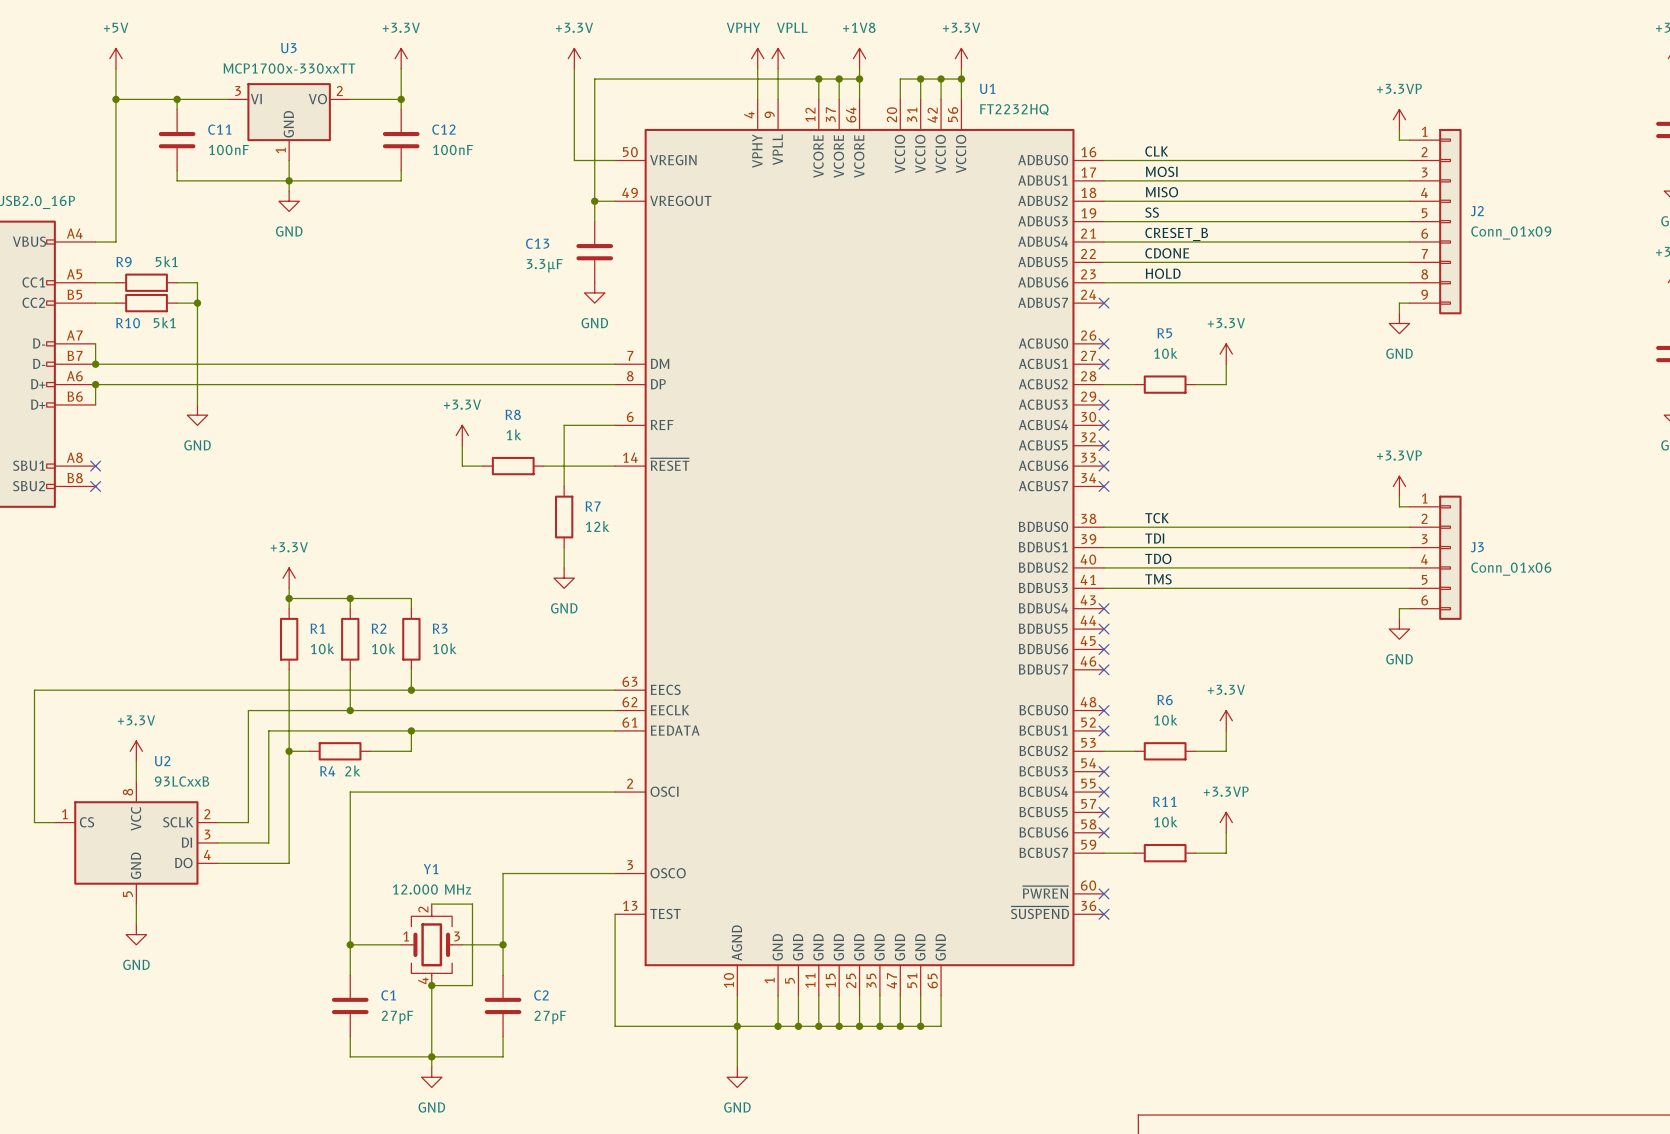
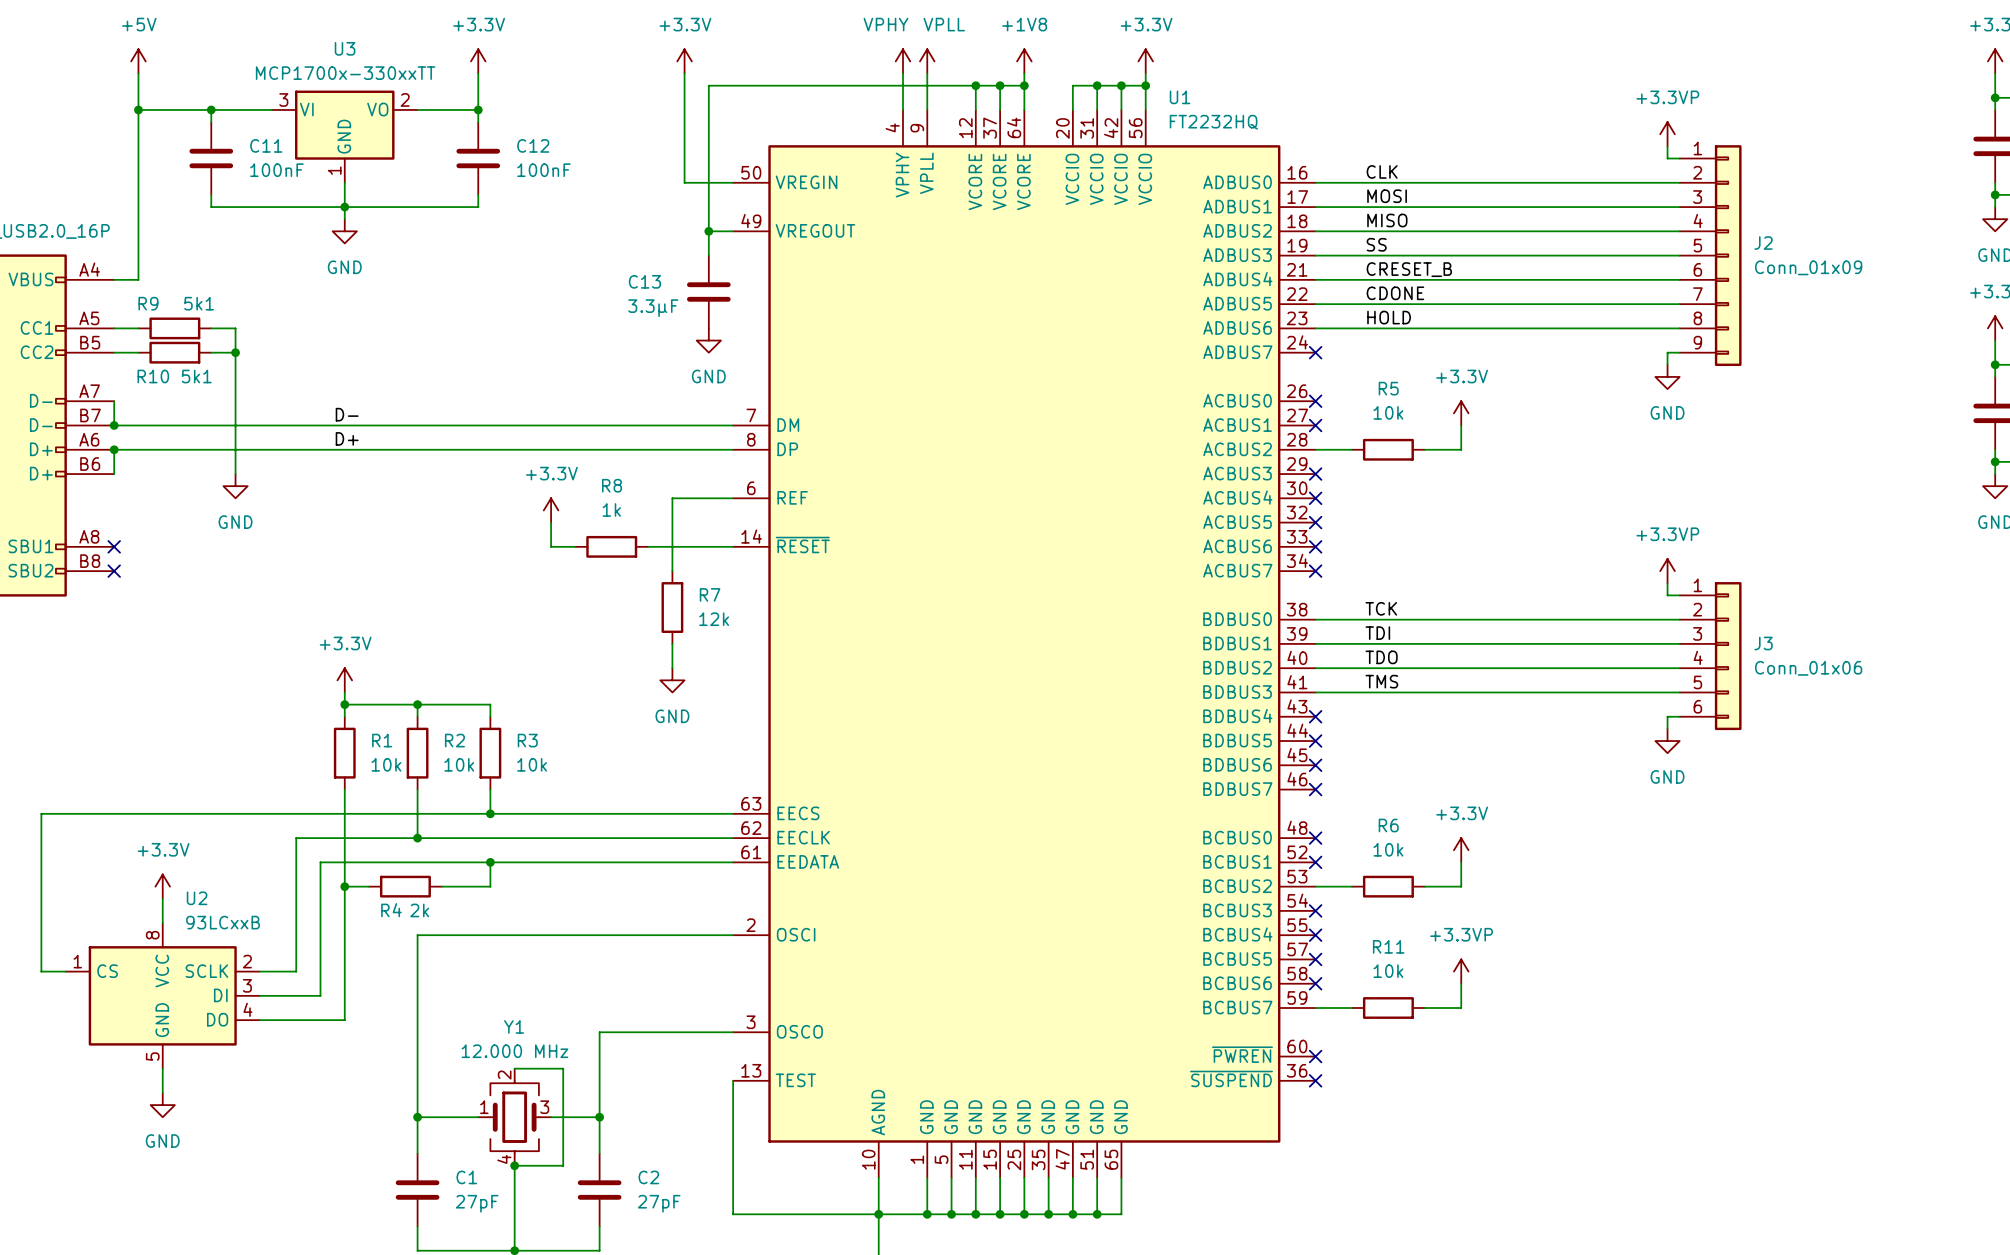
label: none -> D- (347, 414)
label: none -> D+ (347, 438)

